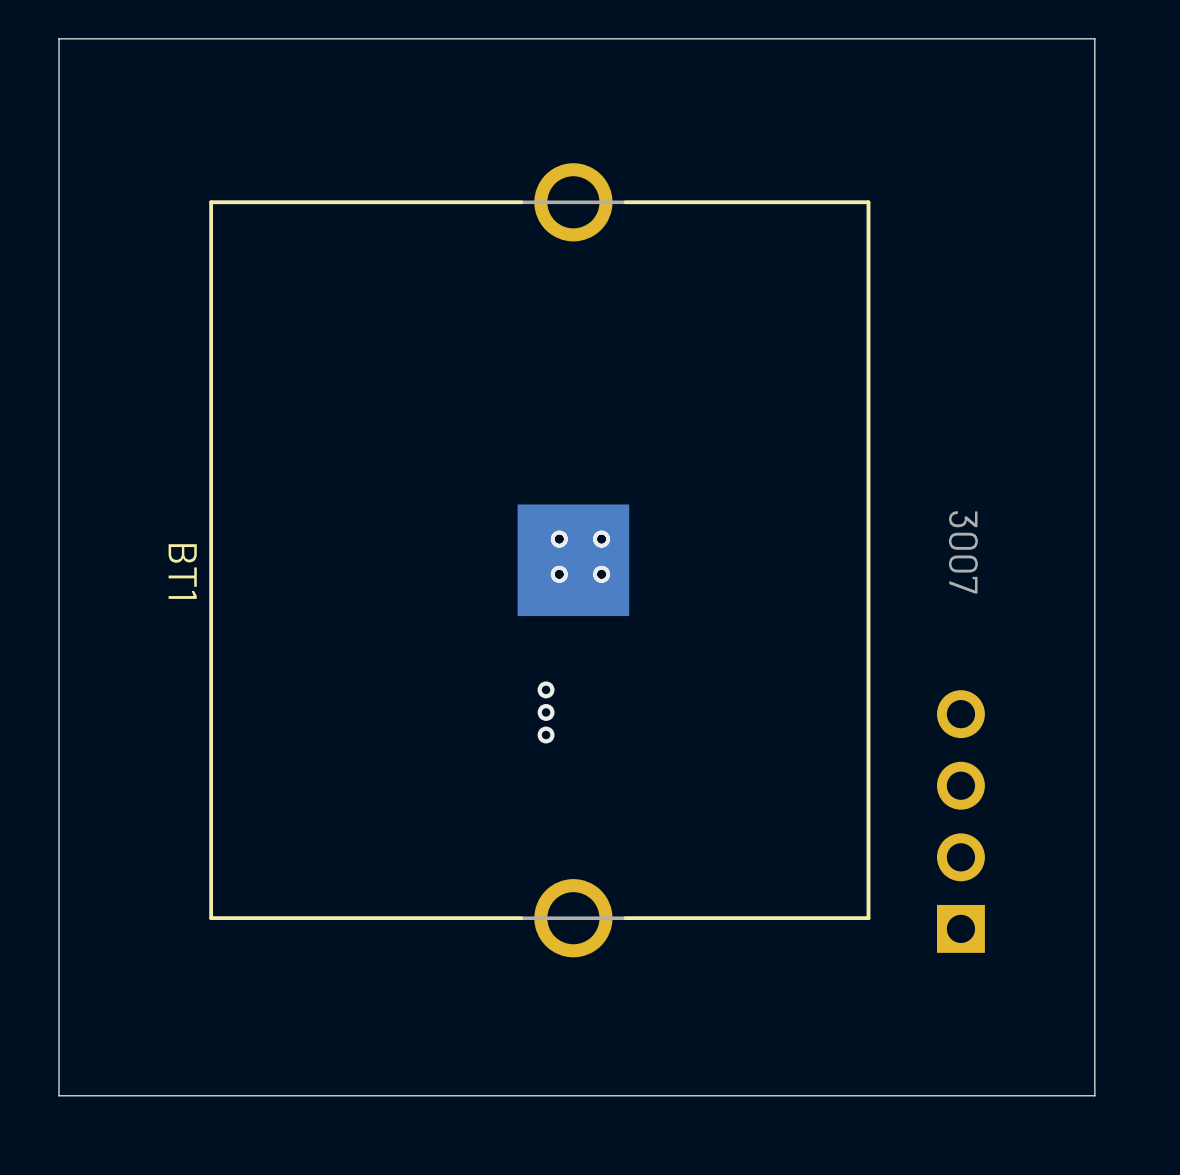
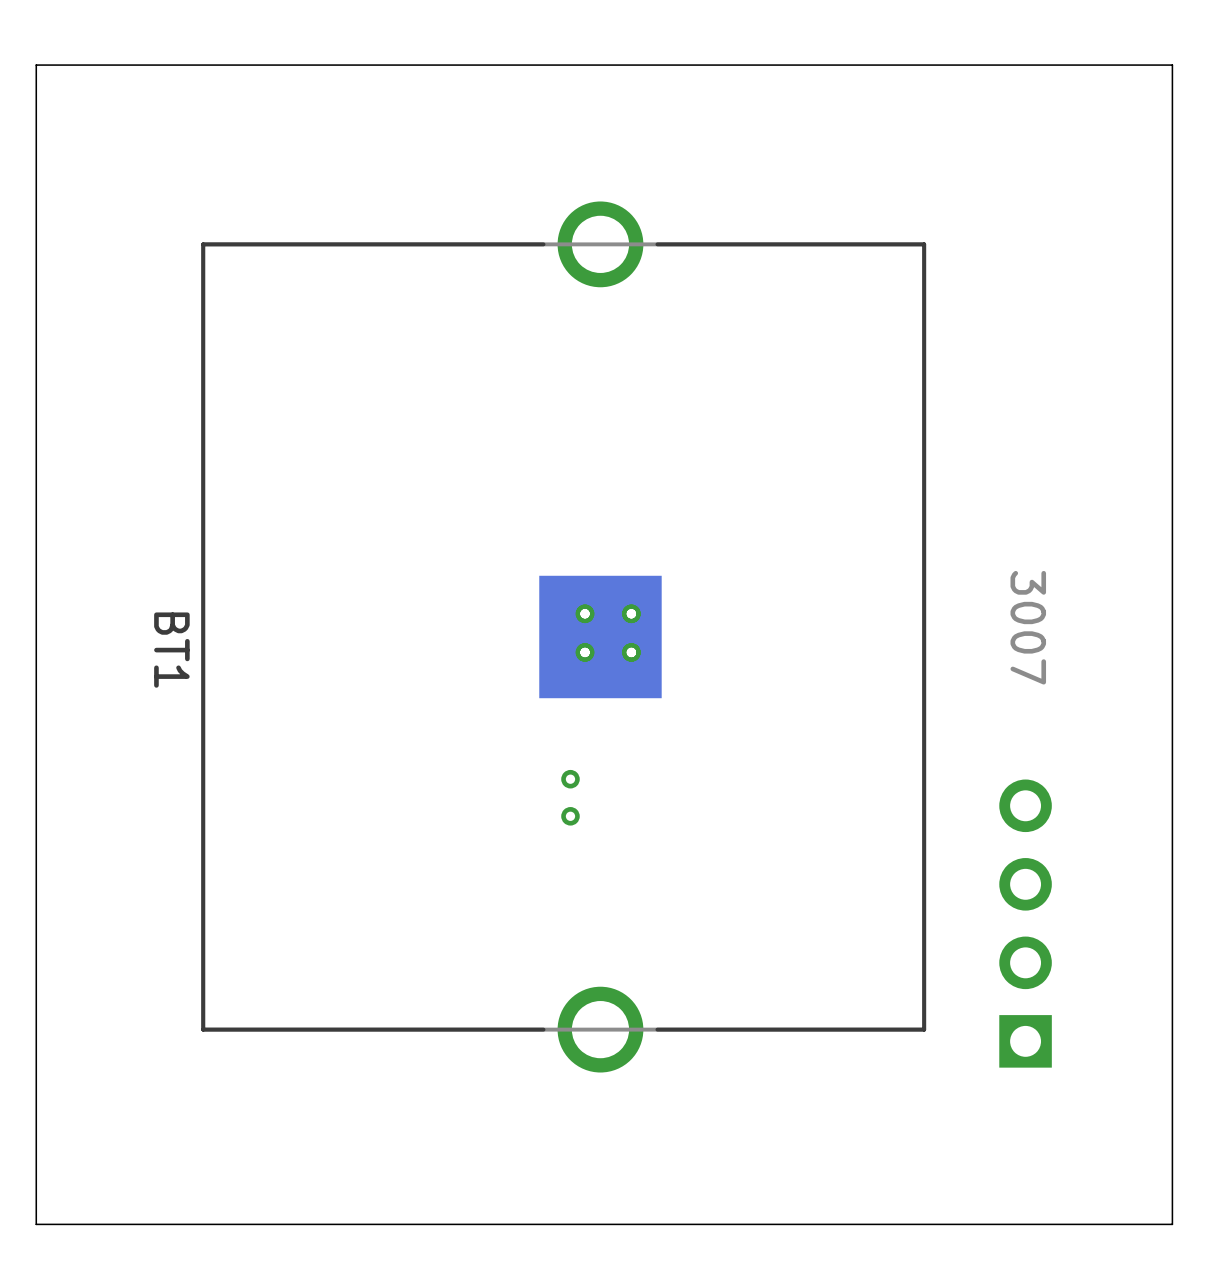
via: (546, 712) -> none
via: none -> (570, 816)
via: (546, 735) -> none

